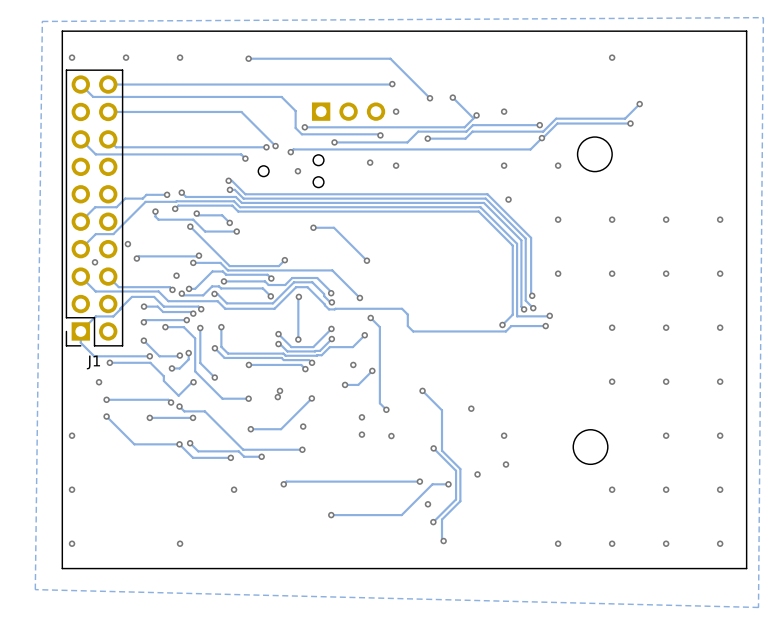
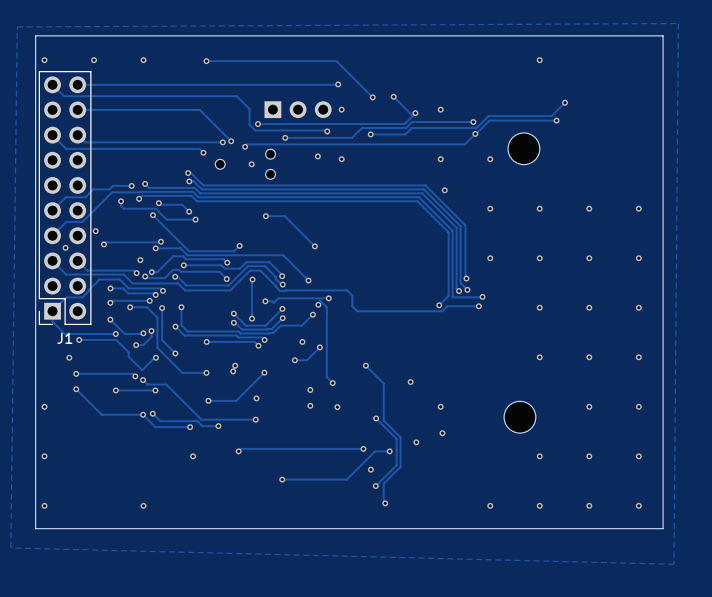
via: (370, 317) -> none
track: none -> (328, 298) (278, 298) (273, 302) (265, 301)
via: none -> (328, 298)
via: none -> (265, 301)
via: none -> (318, 304)

